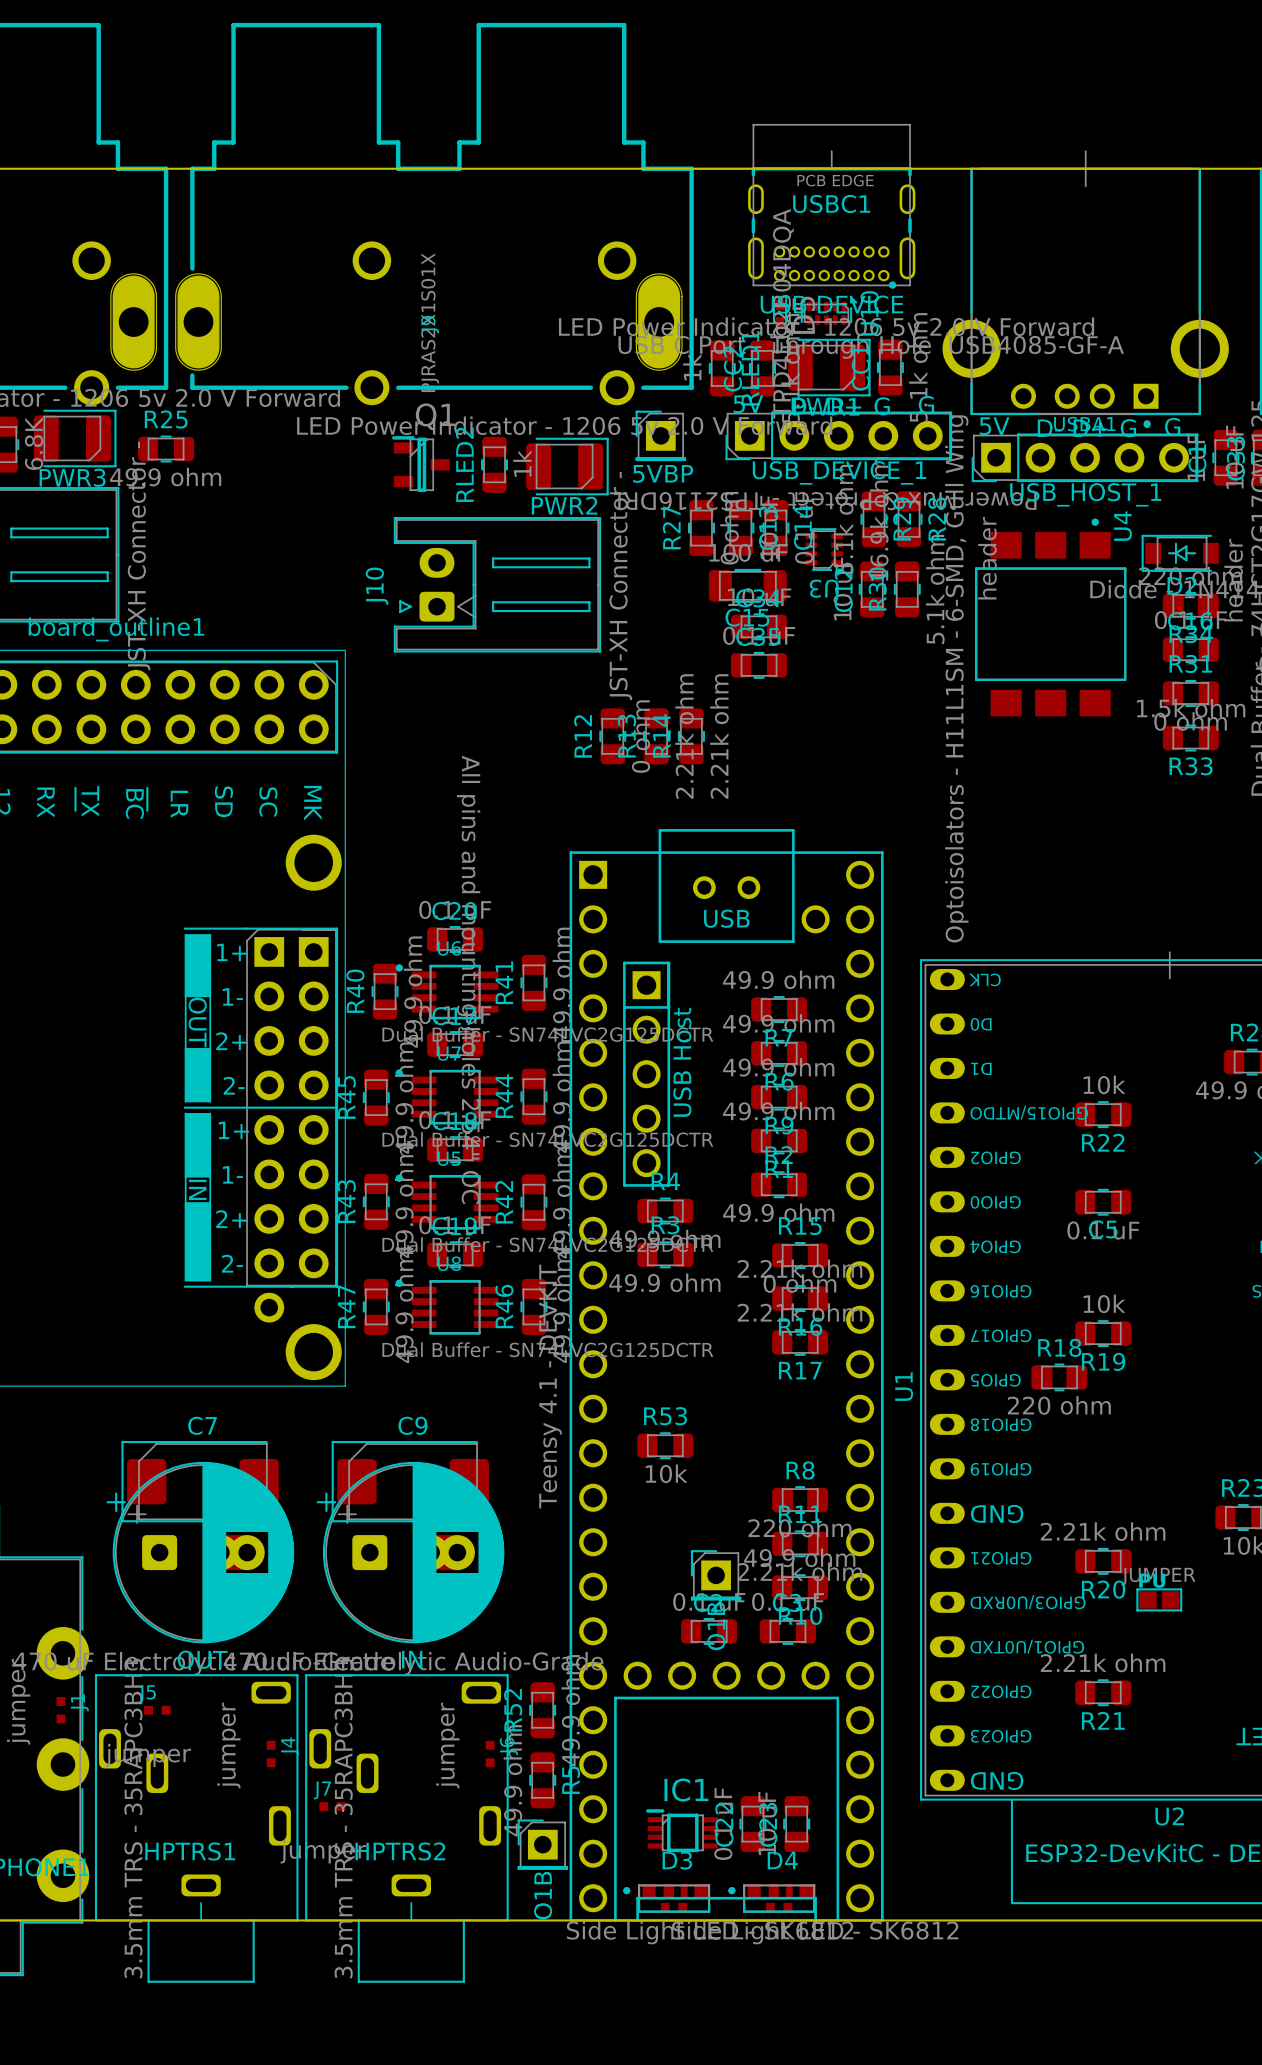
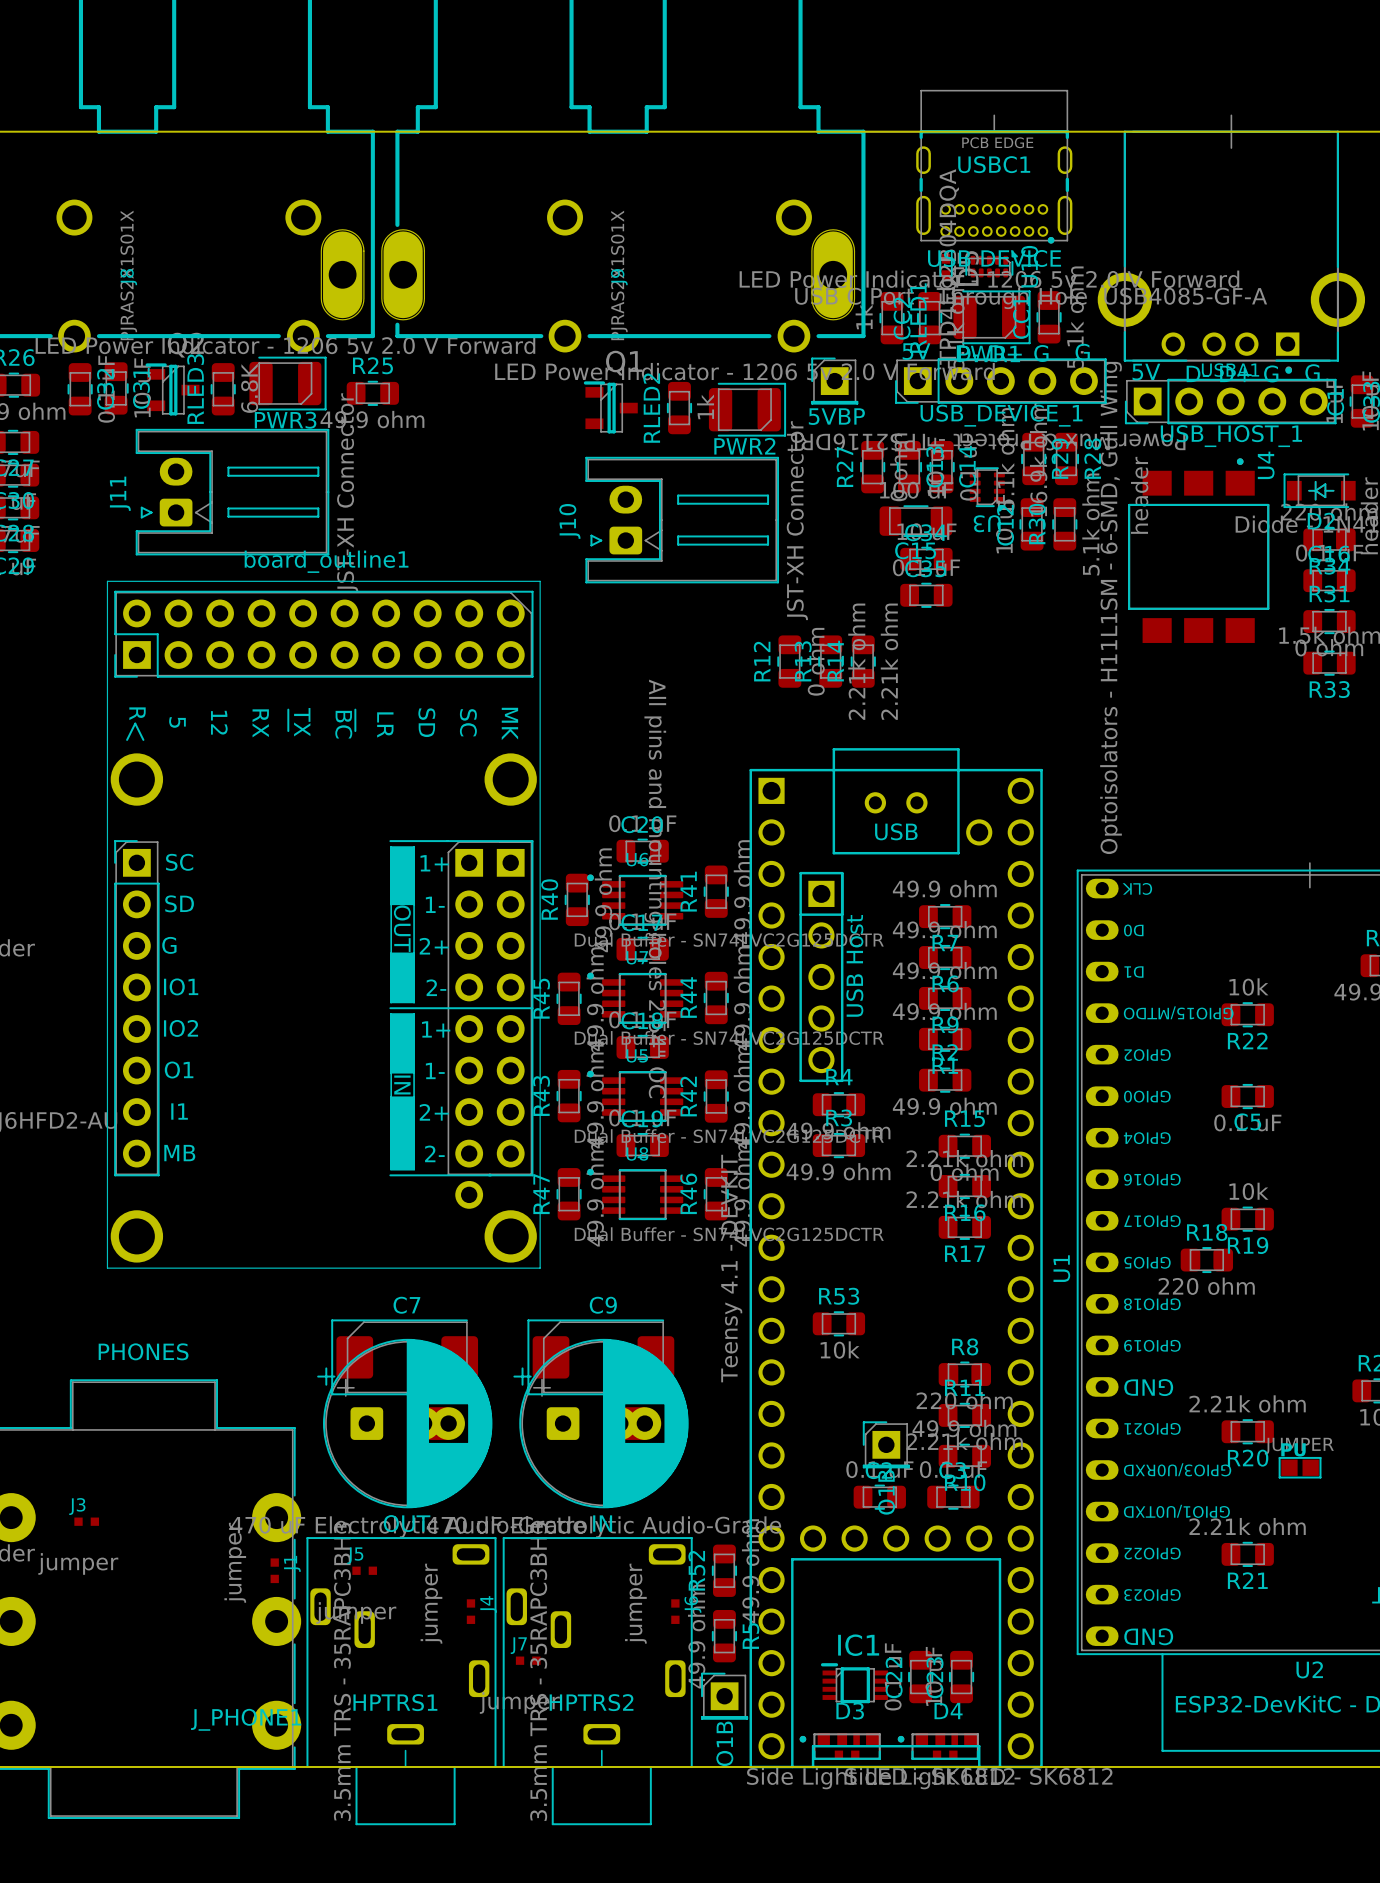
J11 value: JST-XH Connector - (139, 556) -> JST-XH Connector (347, 492)
J10 value: JST-XH Connector - (620, 585) -> JST-XH Connector (797, 520)

